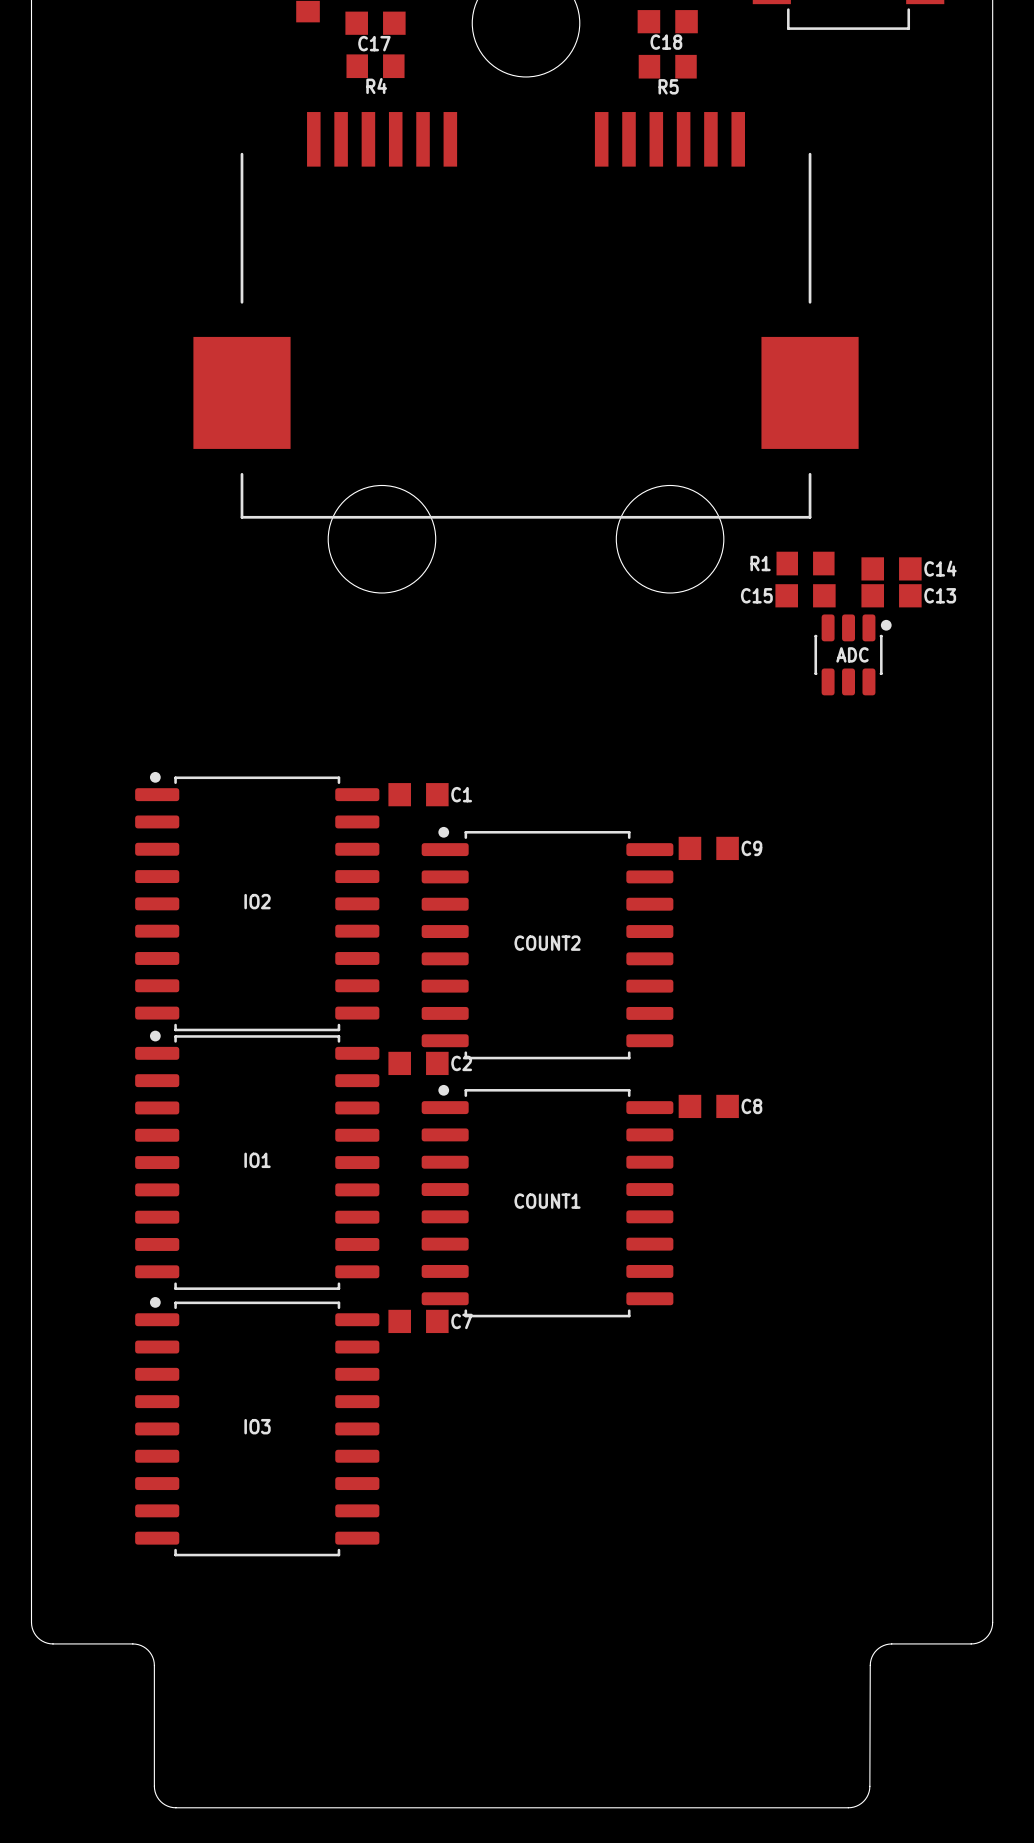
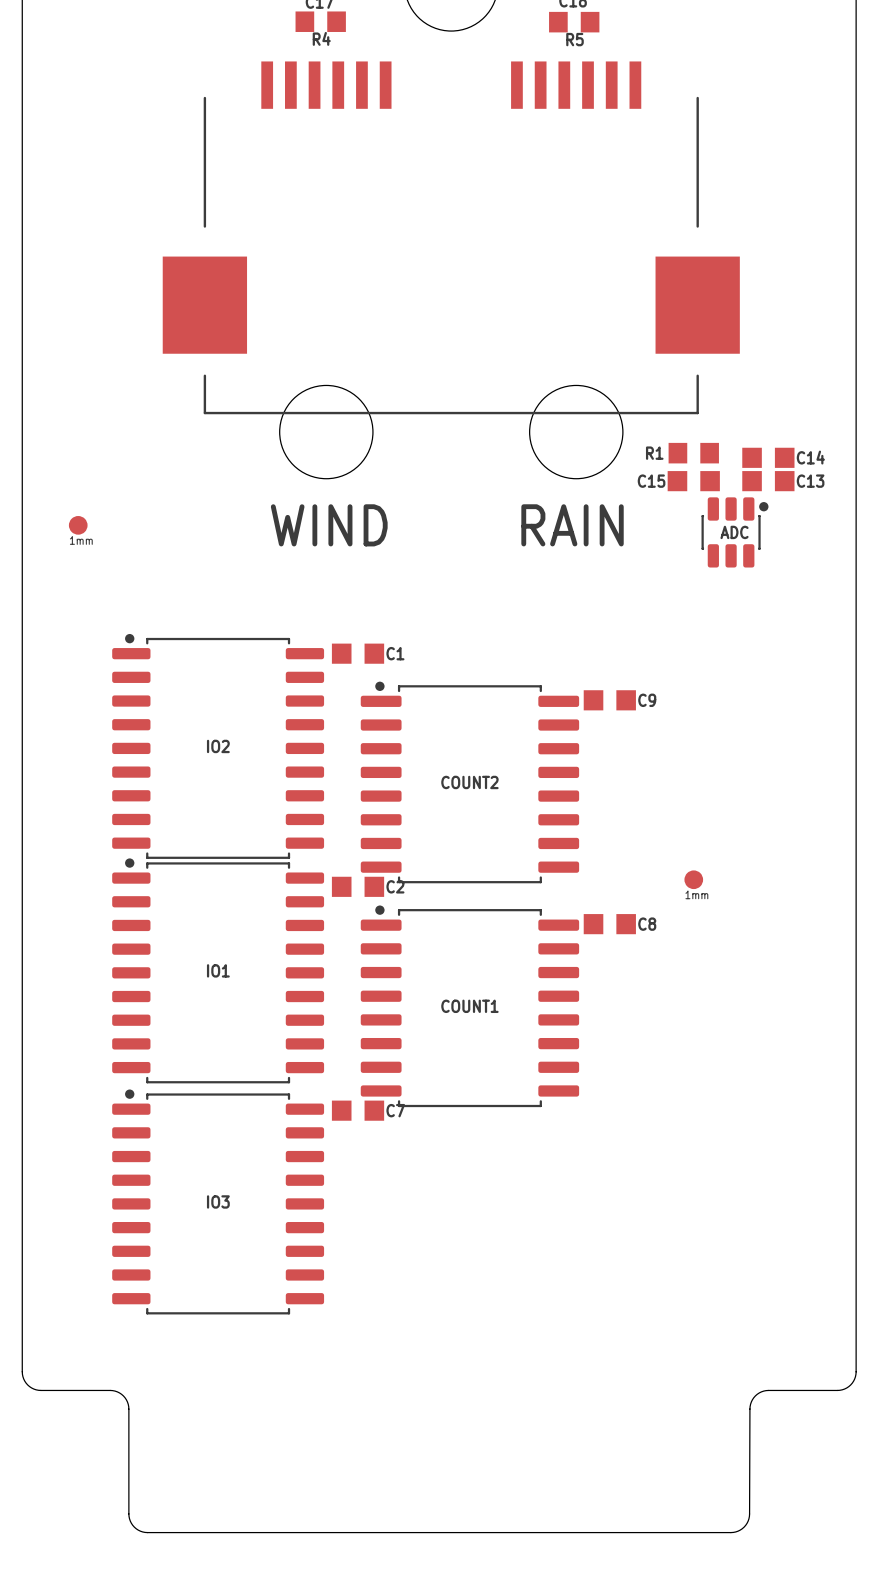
part: none -> (78, 525)
text: none -> WIND (329, 525)
text: none -> RAIN (572, 525)
part: none -> (693, 879)

